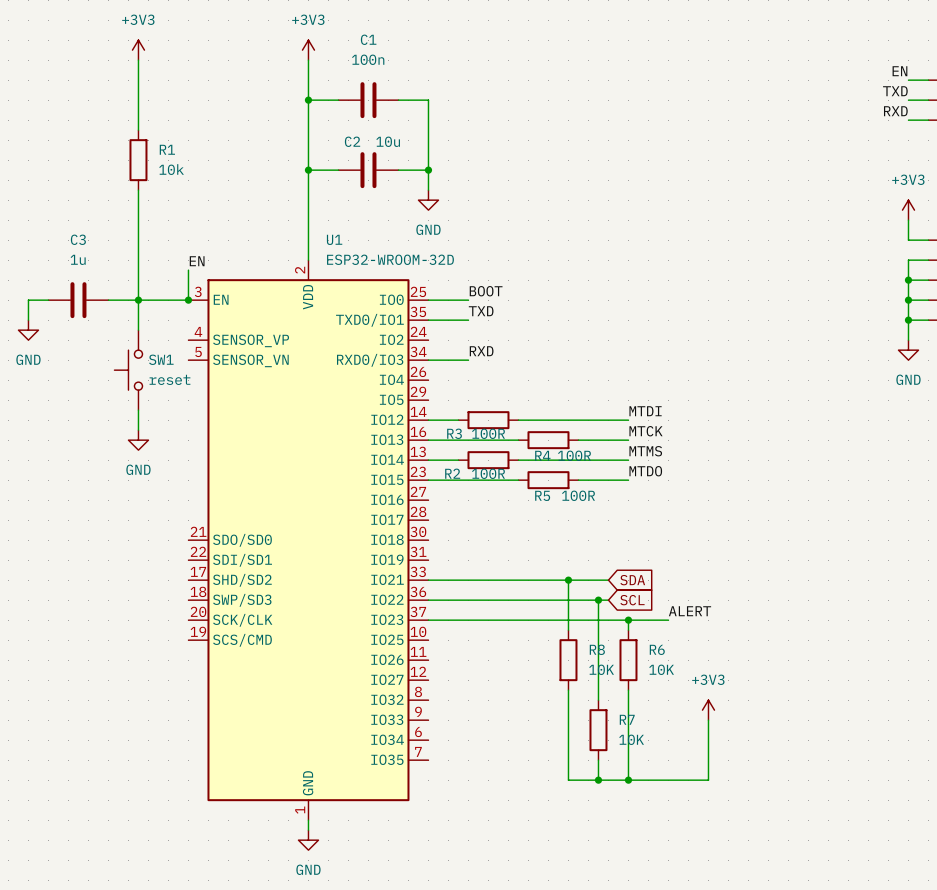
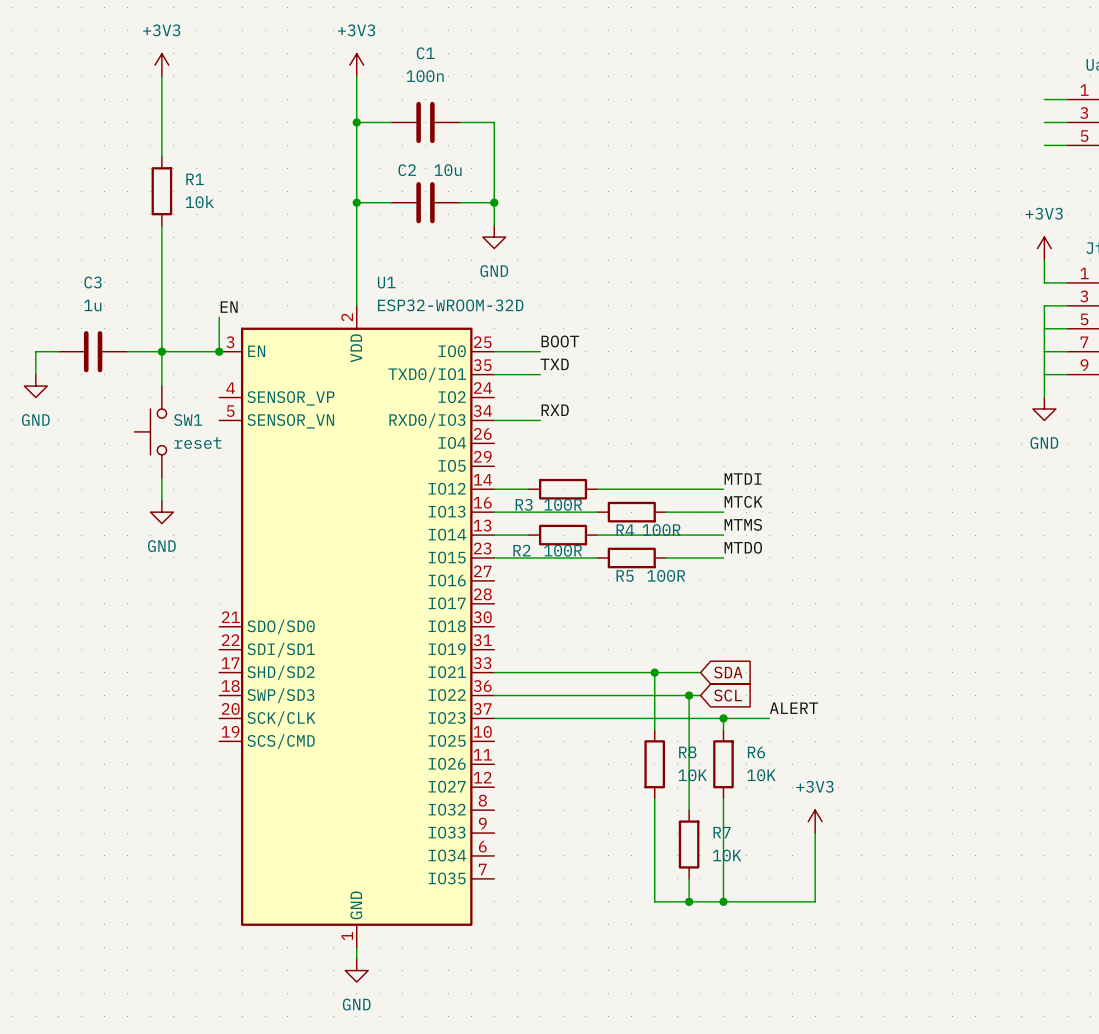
label: EN (899, 71) -> none
label: TXD (895, 91) -> none
label: RXD (895, 111) -> none
junction: (908, 280) -> none
junction: (908, 300) -> none
junction: (908, 320) -> none

